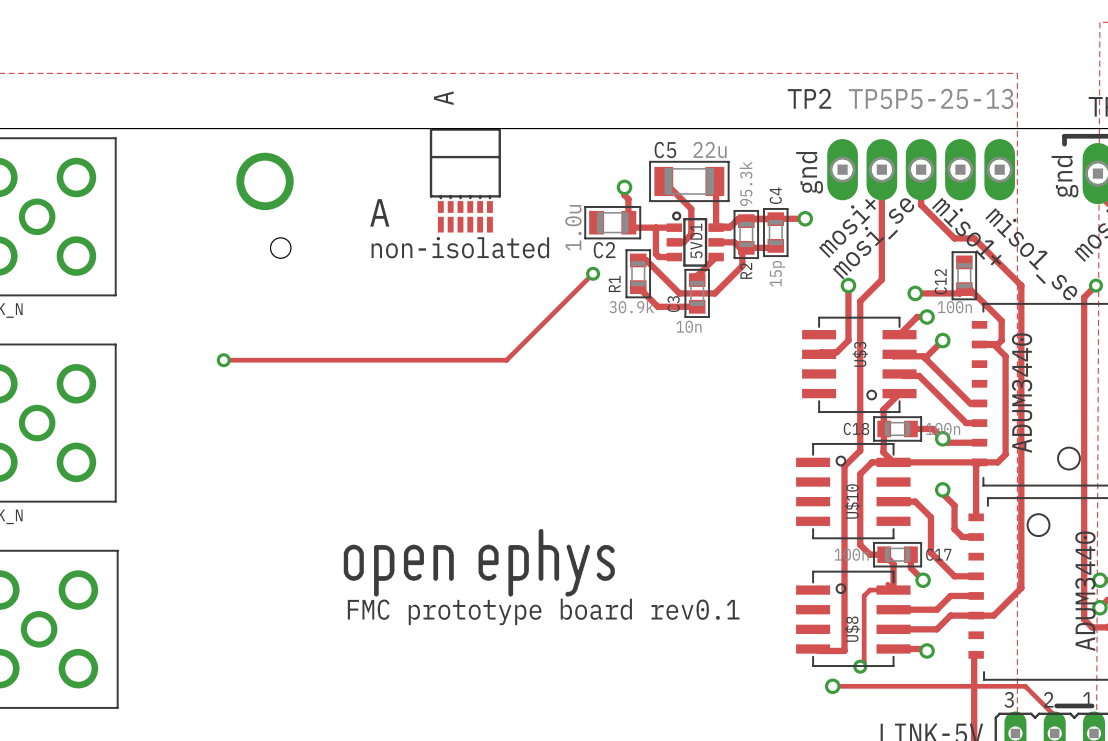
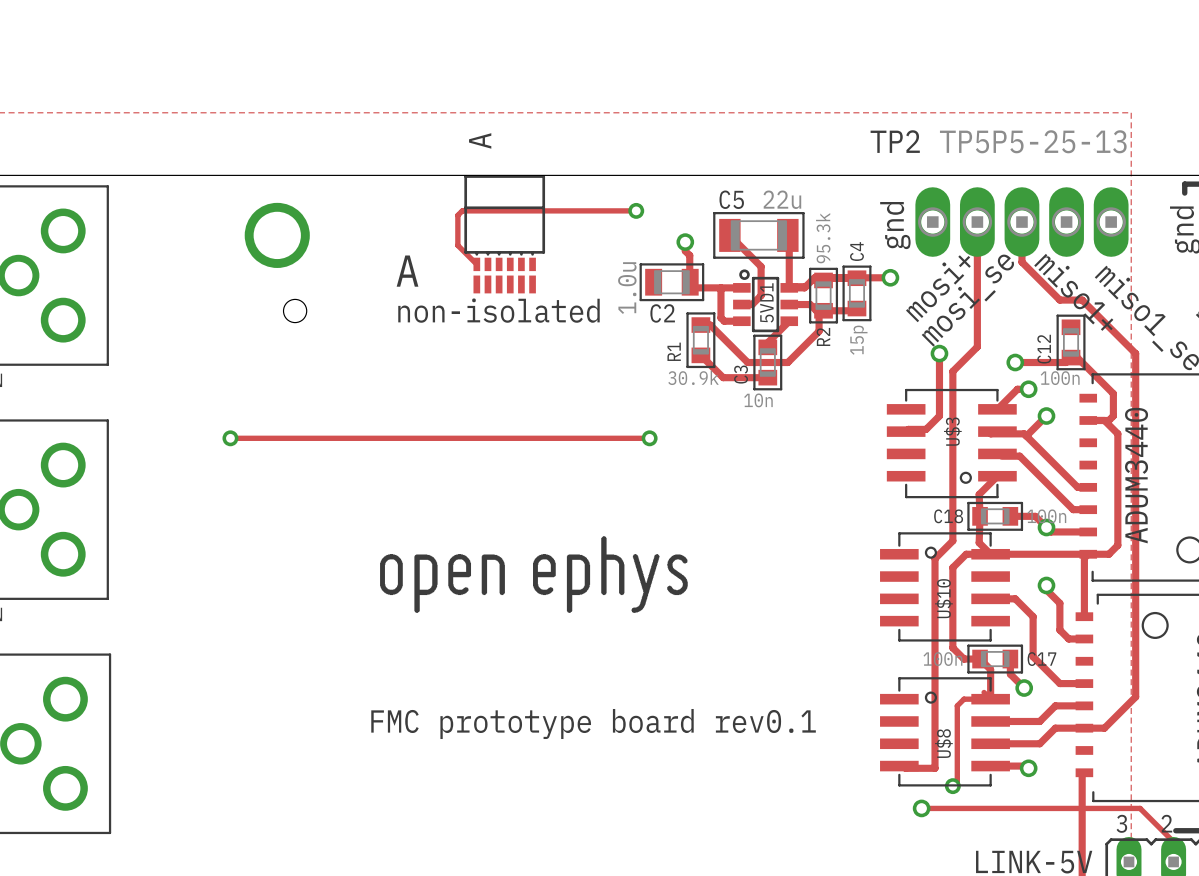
track: none -> (636, 210) (462, 210) (457, 215) (457, 245) (476, 264)
via: none -> (636, 210)
track: (593, 273) (506, 360) -> (649, 438) (551, 438)
via: (593, 273) -> none
via: none -> (649, 438)
drawing position: (479, 562) -> (533, 574)

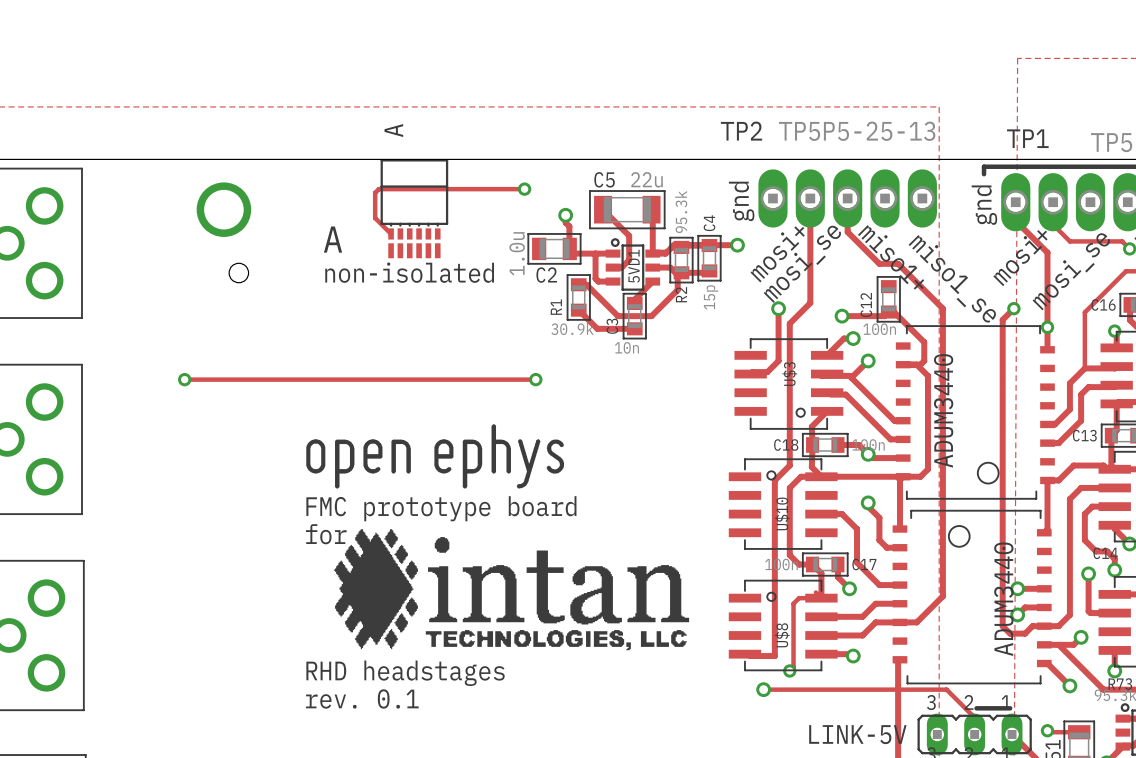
drawing position: (533, 574) -> (435, 456)
text: none -> FMC prototype board (441, 508)
drawing: none -> [333, 529, 690, 651]
text: none -> for (326, 534)
text: FMC prototype board rev0.1 (593, 724) -> none
text: none -> RHD headstages (405, 673)
text: none -> rev. 0.1 (362, 698)

